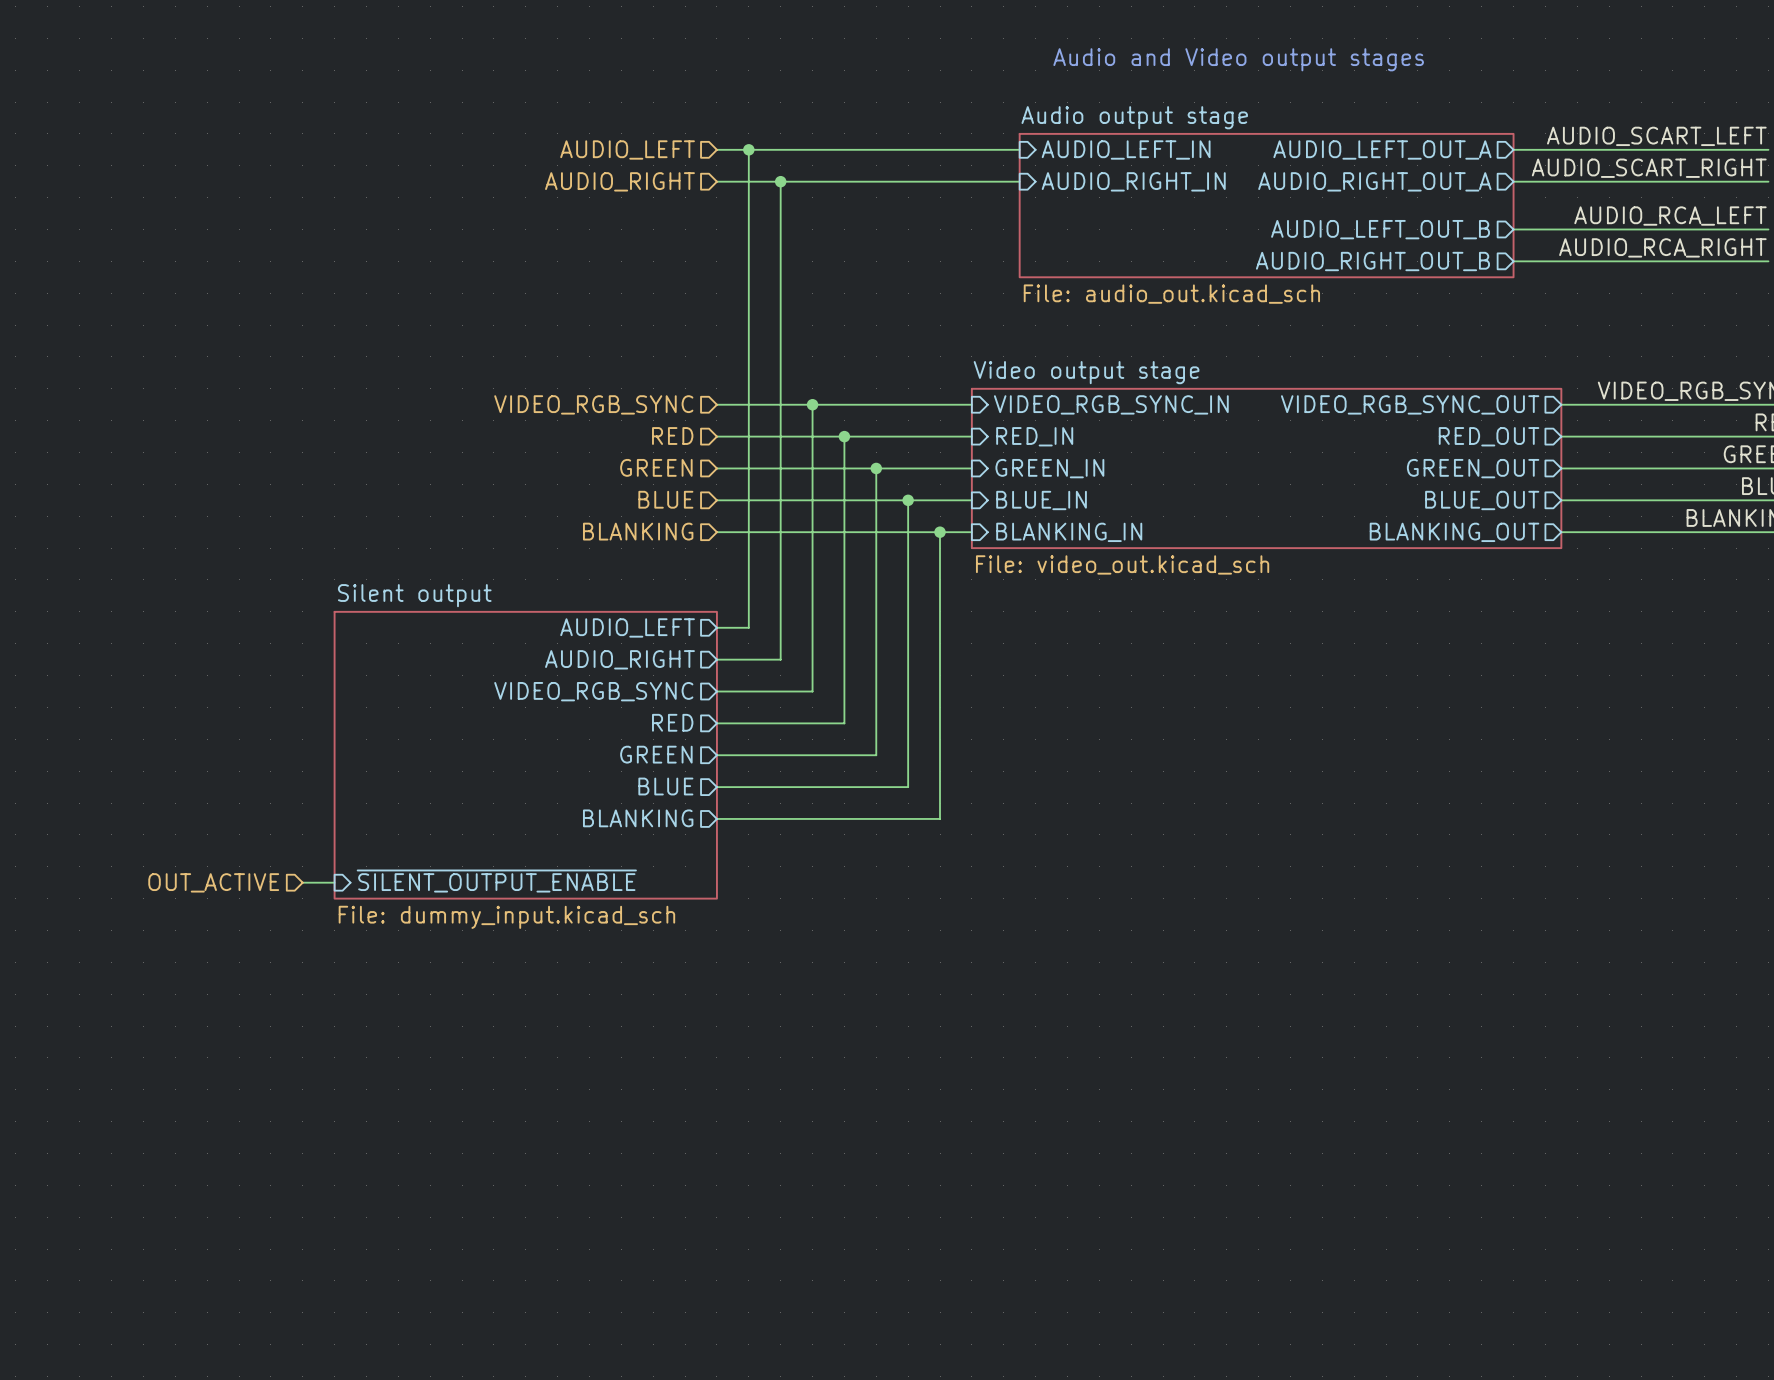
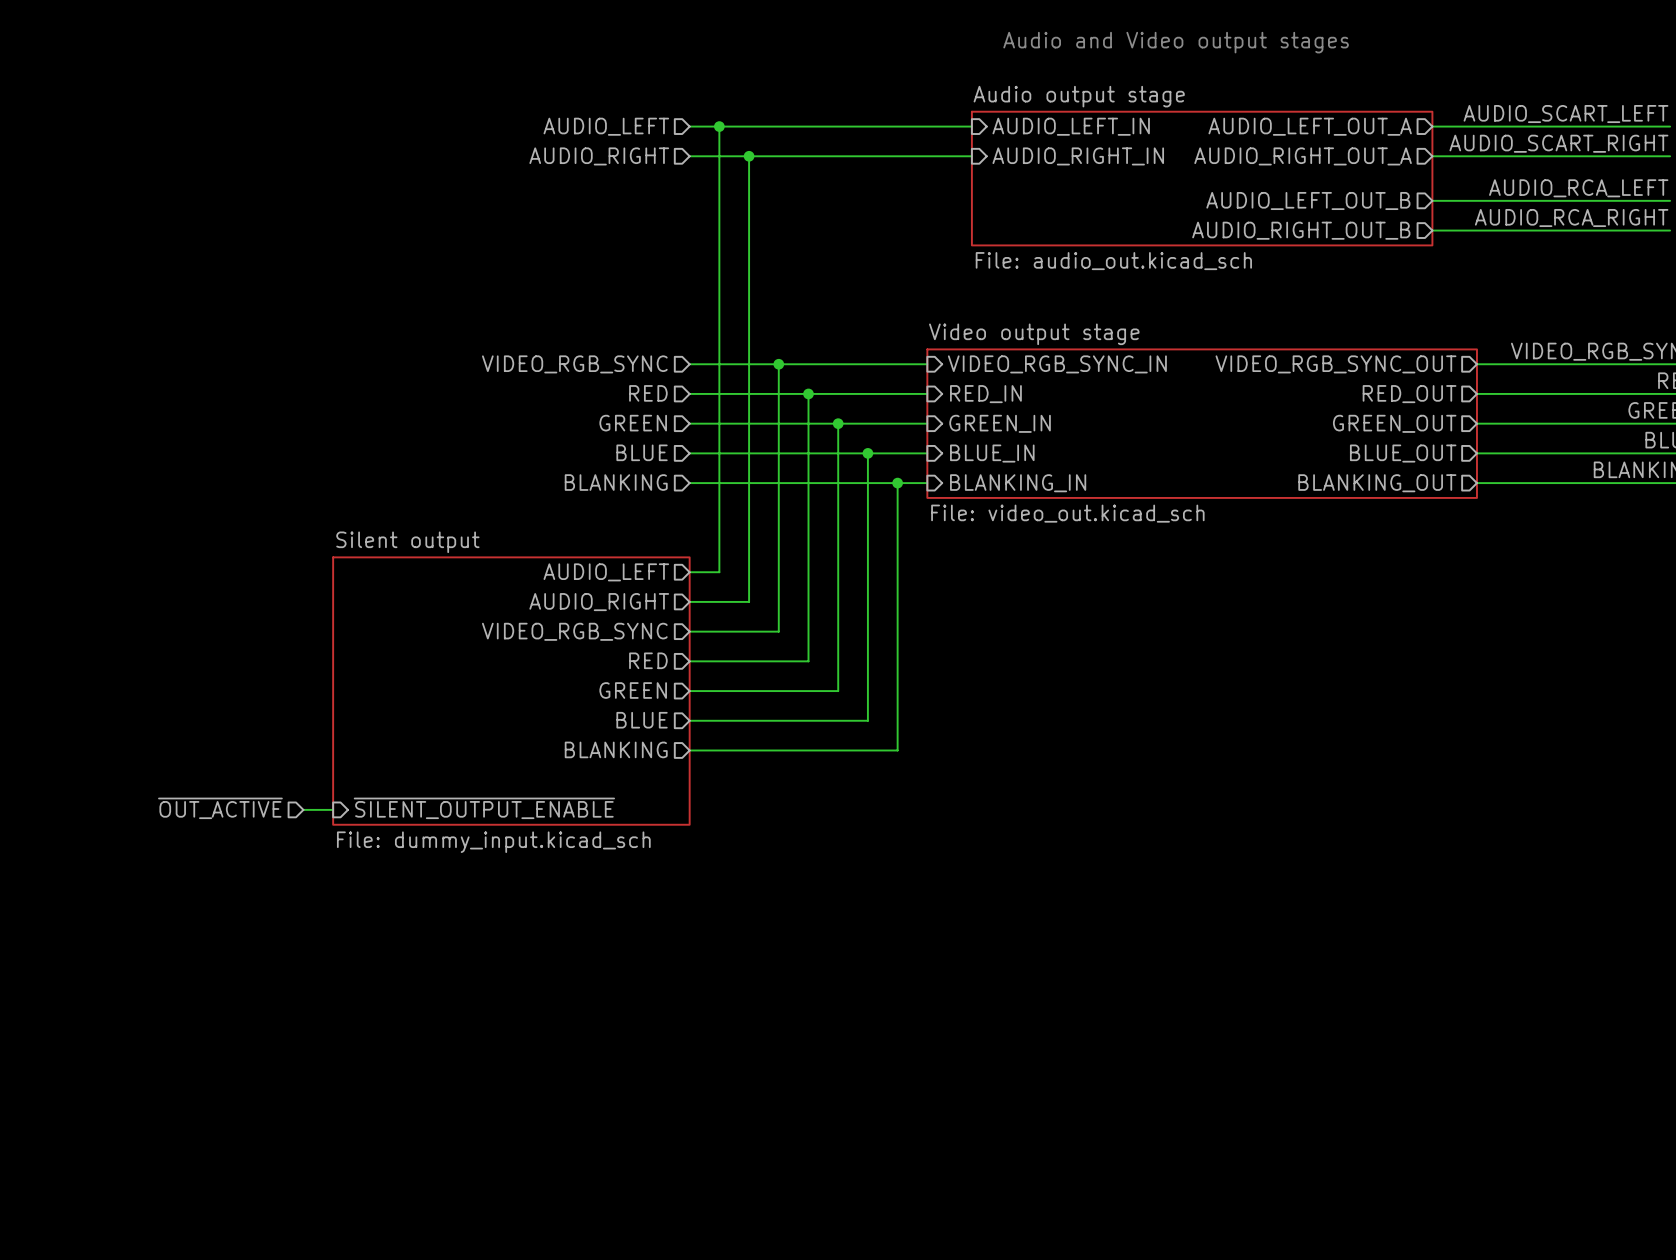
hierarchical label: OUT_ACTIVE (213, 882) -> ~{OUT_ACTIVE} (220, 808)

